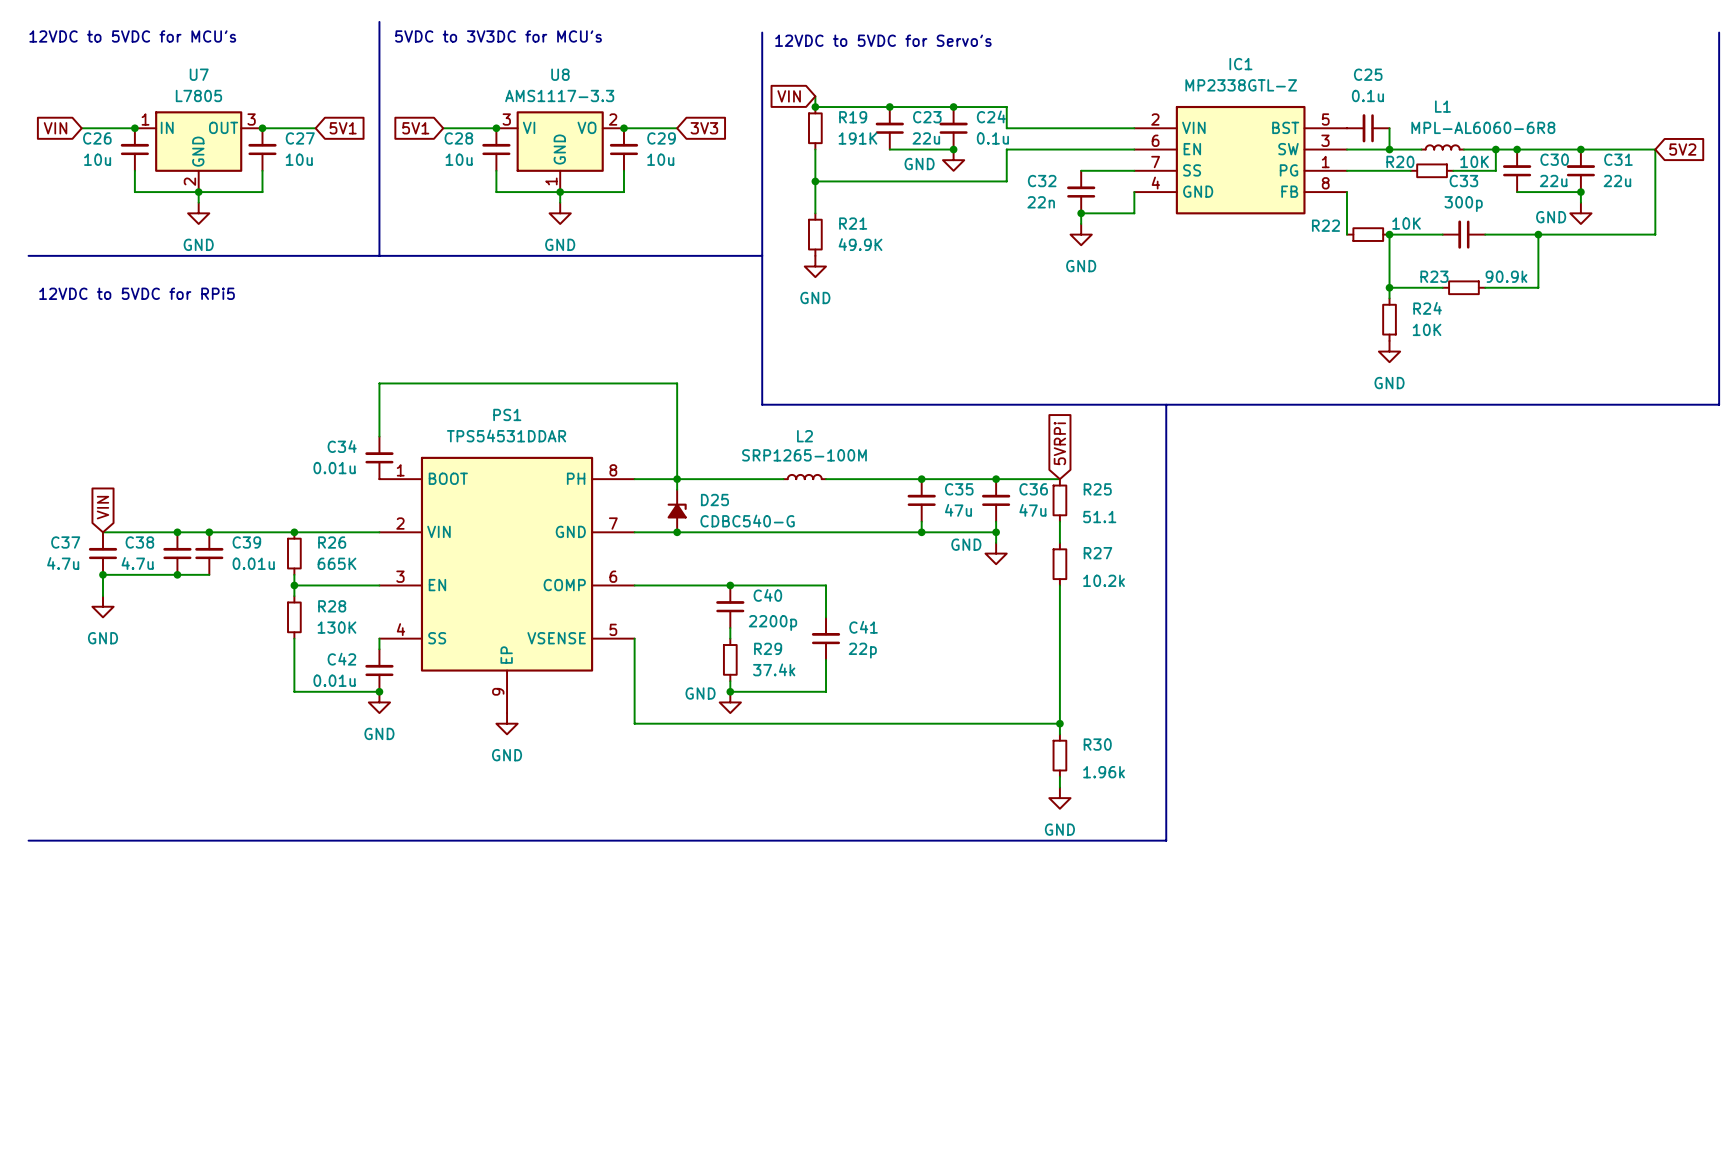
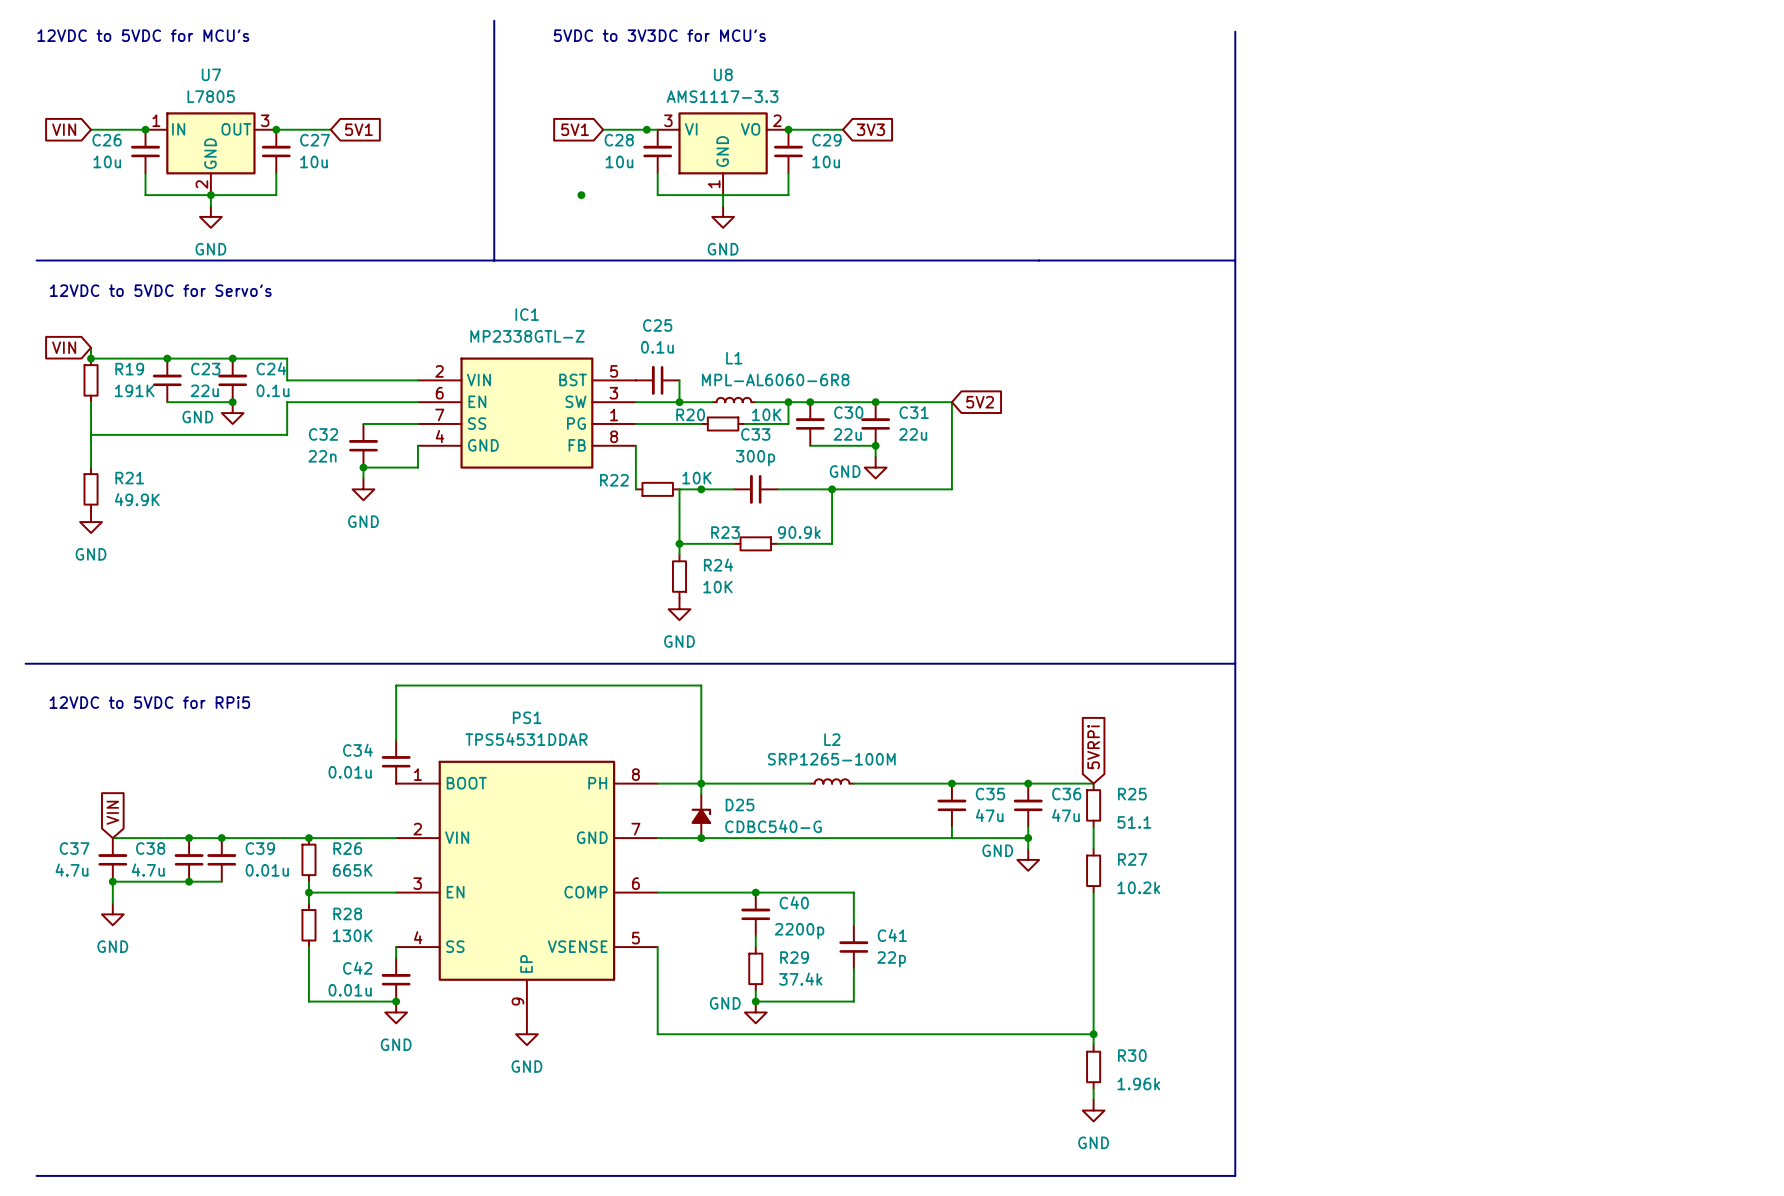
line: (379, 21) (379, 255) -> (494, 20) (494, 260)
line: (762, 32) (762, 404) (1719, 404) (1719, 32) -> none
line: none -> (1235, 31) (1235, 1175) (36, 1175)
text position: 5VDC to 3V3DC for MCU's (498, 36) -> 5VDC to 3V3DC for MCU's (659, 35)
text: 12VDC to 5VDC for Servo's (883, 40) -> none
global label: VIN (789, 96) -> none
wire: (815, 96) (815, 107) (1006, 107) (1006, 128) (1134, 128) -> none
junction: (815, 107) -> none
junction: (889, 107) -> none
junction: (953, 107) -> none
global label position: 5V1 (415, 128) -> 5V1 (575, 129)
wire: (443, 128) (496, 128) -> none
junction: (496, 128) -> none
global label position: 3V3 (704, 128) -> 3V3 (870, 129)
wire: none -> (788, 129) (842, 129)
junction: none -> (788, 129)
R19 position: (815, 128) -> (91, 380)
C23 position: (889, 128) -> (167, 380)
C24 position: (953, 128) -> (232, 380)
C25 position: (1368, 128) -> (657, 380)
wire: (1389, 128) (1389, 149) -> none
L1 position: (1442, 147) -> (733, 400)
C28 position: (496, 149) -> (657, 151)
C29 position: (623, 149) -> (788, 151)
wire: (815, 149) (815, 213) -> none
wire: (889, 149) (953, 149) -> none
junction: (953, 149) -> none
wire: (1134, 149) (1006, 149) (1006, 181) (815, 181) -> none
wire: (1346, 149) (1421, 149) -> none
junction: (1389, 149) -> none
wire: (1463, 149) (1655, 149) (1655, 234) (1485, 234) -> none
wire: (1495, 149) (1495, 170) (1453, 170) -> none
junction: (1495, 149) -> none
junction: (1517, 149) -> none
junction: (1580, 149) -> none
global label: 5V2 (1682, 149) -> none
U8 position: (560, 151) -> (723, 153)
power symbol: GND (953, 160) -> none
IC1 position: (1240, 160) -> (526, 413)
wire: (496, 170) (496, 192) (623, 192) (623, 170) -> (657, 173) (657, 195) (788, 195) (788, 173)
wire: (1081, 170) (1134, 170) -> none
wire: (1346, 170) (1410, 170) -> none
R20 position: (1432, 170) -> (723, 423)
C30 position: (1517, 170) -> (810, 423)
C31 position: (1580, 170) -> (875, 423)
junction: (815, 181) -> none
wire: (560, 192) (560, 202) -> (723, 195) (723, 206)
C32 position: (1081, 192) -> (363, 445)
wire: (1134, 192) (1134, 213) (1081, 213) (1081, 223) -> none
wire: (1346, 192) (1346, 234) -> none
wire: (1517, 192) (1580, 192) (1580, 202) -> none
junction: (1580, 192) -> none
power symbol: GND (560, 213) -> none
power symbol: none -> GND (723, 216)
junction: (1081, 213) -> none
power symbol: GND (1580, 213) -> none
R21 position: (815, 234) -> (91, 489)
power symbol: GND (1081, 234) -> none
R22 position: (1368, 234) -> (657, 489)
junction: (1389, 234) -> none
wire: (1442, 234) (1389, 234) (1389, 298) -> none
C33 position: (1463, 234) -> (755, 489)
wire: (1538, 234) (1538, 287) (1485, 287) -> none
junction: (1538, 234) -> none
line: none -> (788, 260) (1235, 260)
power symbol: GND (815, 266) -> none
wire: (1389, 287) (1442, 287) -> none
junction: (1389, 287) -> none
R23 position: (1463, 287) -> (755, 543)
text: 12VDC to 5VDC for RPi5 (137, 293) -> 12VDC to 5VDC for Servo's (160, 290)
R24 position: (1389, 319) -> (679, 576)
global label: none -> VIN (64, 347)
wire: none -> (91, 347) (91, 358) (287, 358) (287, 380) (417, 380)
junction: none -> (91, 358)
junction: none -> (167, 358)
junction: none -> (232, 358)
power symbol: GND (1389, 351) -> none
wire: none -> (679, 380) (679, 402)
wire: none -> (91, 402) (91, 467)
wire: none -> (167, 402) (232, 402)
junction: none -> (232, 402)
wire: none -> (417, 402) (287, 402) (287, 434) (91, 434)
wire: none -> (635, 402) (712, 402)
junction: none -> (679, 402)
wire: none -> (788, 402) (788, 423) (744, 423)
junction: none -> (788, 402)
junction: none -> (810, 402)
junction: none -> (875, 402)
global label: none -> 5V2 (980, 402)
power symbol: none -> GND (232, 413)
line: (1166, 404) (1166, 840) (28, 840) -> none
wire: none -> (363, 423) (417, 423)
wire: none -> (635, 423) (701, 423)
wire: (379, 436) (379, 383) (677, 383) (677, 489) -> none
wire: none -> (417, 445) (417, 467) (363, 467) (363, 478)
wire: none -> (635, 445) (635, 489)
wire: none -> (810, 445) (875, 445) (875, 456)
junction: none -> (875, 445)
global label: 5VRPi (1059, 443) -> none
junction: none -> (363, 467)
C34 position: (379, 457) -> (396, 761)
power symbol: none -> GND (875, 467)
L2 position: (804, 477) -> (832, 781)
power symbol: none -> GND (363, 489)
wire: (634, 479) (655, 479) -> (679, 554) (679, 489)
junction: none -> (832, 489)
wire: (921, 479) (1059, 479) -> (951, 489) (951, 402) (755, 402)
junction: (921, 479) -> none
junction: (996, 479) -> none
C35 position: (921, 500) -> (951, 805)
C36 position: (996, 500) -> (1028, 805)
R25 position: (1059, 500) -> (1093, 805)
global label: VIN (103, 507) -> none
D25 position: (677, 511) -> (701, 816)
wire: (921, 521) (921, 532) -> none
wire: (996, 521) (996, 542) -> none
wire: (1059, 521) (1059, 542) -> none
wire: (103, 532) (379, 532) -> none
junction: (177, 532) -> none
junction: (209, 532) -> none
junction: (294, 532) -> none
wire: (634, 532) (655, 532) -> none
junction position: (677, 532) -> (679, 543)
wire: (709, 532) (751, 532) -> none
wire: (804, 532) (996, 532) -> (832, 543) (832, 489)
junction: (921, 532) -> none
junction: (996, 532) -> none
C37 position: (103, 553) -> (112, 859)
C38 position: (177, 553) -> (189, 859)
C39 position: (209, 553) -> (221, 859)
R26 position: (294, 553) -> (308, 859)
power symbol: GND (996, 553) -> none
R27 position: (1059, 564) -> (1093, 870)
junction: (103, 574) -> none
junction: (177, 574) -> none
wire: (209, 574) (103, 574) (103, 596) -> none
wire: (294, 574) (294, 596) -> none
PS1 position: (507, 584) -> (526, 892)
wire: (294, 585) (379, 585) -> none
junction: (294, 585) -> none
wire: (634, 585) (826, 585) (826, 617) -> none
junction: (730, 585) -> none
wire: (1059, 585) (1059, 734) -> none
power symbol: none -> GND (679, 609)
power symbol position: GND (103, 606) -> GND (91, 522)
C40 position: (730, 606) -> (755, 914)
R28 position: (294, 617) -> (308, 925)
wire: (730, 628) (730, 638) -> none
wire: (294, 638) (294, 691) (379, 691) -> none
wire: (379, 638) (379, 649) -> none
wire: (634, 638) (634, 723) (1059, 723) -> none
C41 position: (826, 638) -> (853, 947)
line: none -> (25, 663) (1235, 663)
R29 position: (730, 659) -> (755, 968)
wire: (826, 659) (826, 691) (730, 691) (730, 681) -> none
C42 position: (379, 670) -> (396, 979)
text: none -> 12VDC to 5VDC for RPi5 (149, 702)
junction: (379, 691) -> none
junction: (730, 691) -> none
power symbol: GND (379, 702) -> none
power symbol: GND (730, 702) -> none
wire: none -> (396, 740) (396, 685) (701, 685) (701, 794)
power symbol: GND (507, 723) -> none
junction: (1059, 723) -> none
global label: none -> 5VRPi (1093, 747)
R30 position: (1059, 755) -> (1093, 1066)
wire: none -> (657, 783) (810, 783)
junction: none -> (701, 783)
wire: none -> (853, 783) (1093, 783)
junction: none -> (951, 783)
junction: none -> (1028, 783)
wire: (1059, 776) (1059, 787) -> (951, 827) (951, 838)
global label: none -> VIN (112, 812)
power symbol position: GND (1059, 798) -> GND (1028, 859)
wire: none -> (1028, 827) (1028, 848)
wire: none -> (1093, 827) (1093, 848)
wire: none -> (112, 838) (396, 838)
junction: none -> (189, 838)
junction: none -> (221, 838)
junction: none -> (308, 838)
wire: none -> (657, 838) (1028, 838)
junction: none -> (701, 838)
junction: none -> (1028, 838)
power symbol text position: GND (1059, 829) -> GND (997, 850)
junction: none -> (112, 881)
junction: none -> (189, 881)
wire: none -> (221, 881) (112, 881) (112, 903)
wire: none -> (308, 881) (308, 903)
wire: none -> (308, 892) (396, 892)
junction: none -> (308, 892)
wire: none -> (657, 892) (853, 892) (853, 925)
junction: none -> (755, 892)
wire: none -> (1093, 892) (1093, 1045)
power symbol: none -> GND (112, 914)
wire: none -> (755, 936) (755, 947)
wire: none -> (308, 947) (308, 1001) (396, 1001)
wire: none -> (396, 947) (396, 957)
wire: none -> (657, 947) (657, 1034) (1093, 1034)
wire: none -> (853, 968) (853, 1001) (755, 1001) (755, 990)
junction: none -> (396, 1001)
junction: none -> (755, 1001)
power symbol: none -> GND (396, 1012)
power symbol: none -> GND (755, 1012)
power symbol: none -> GND (526, 1034)
junction: none -> (1093, 1034)
wire: none -> (1093, 1088) (1093, 1099)
power symbol: none -> GND (1093, 1110)

